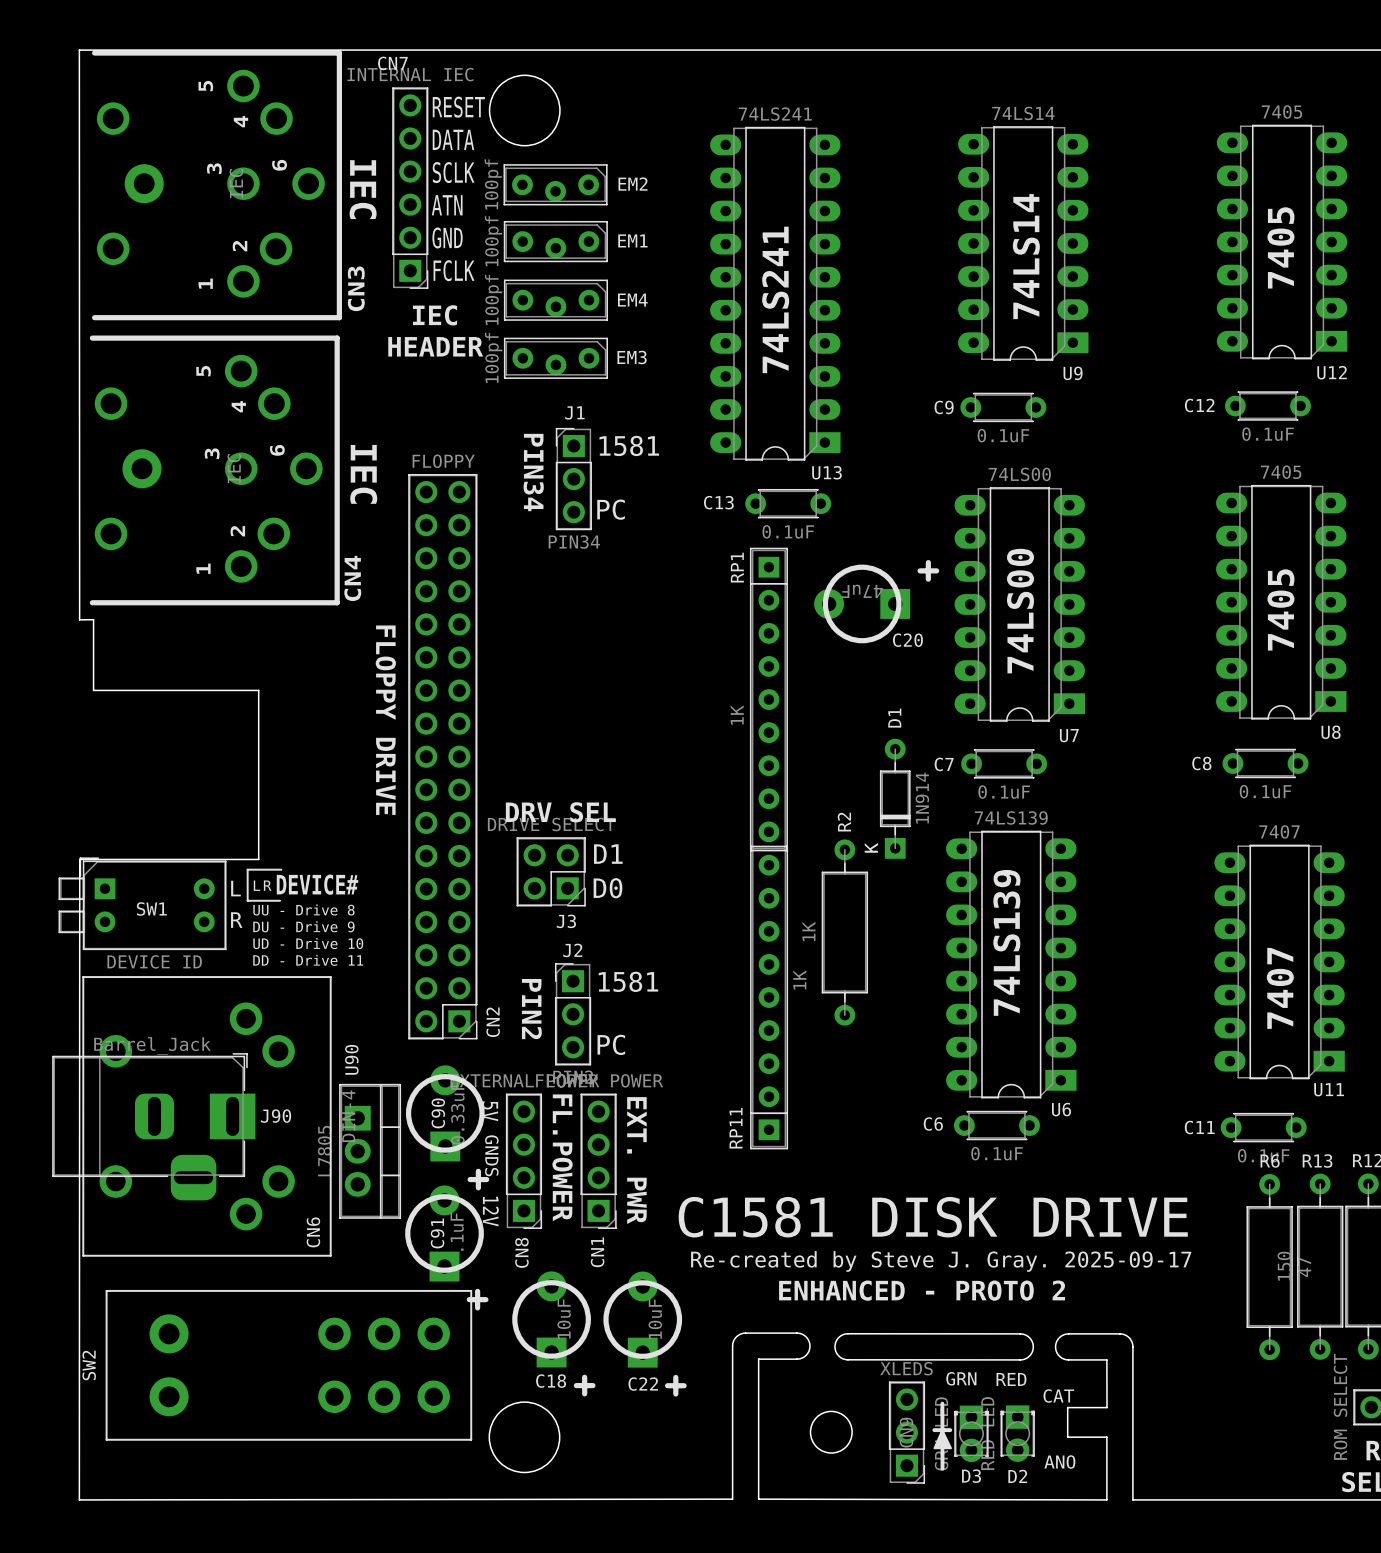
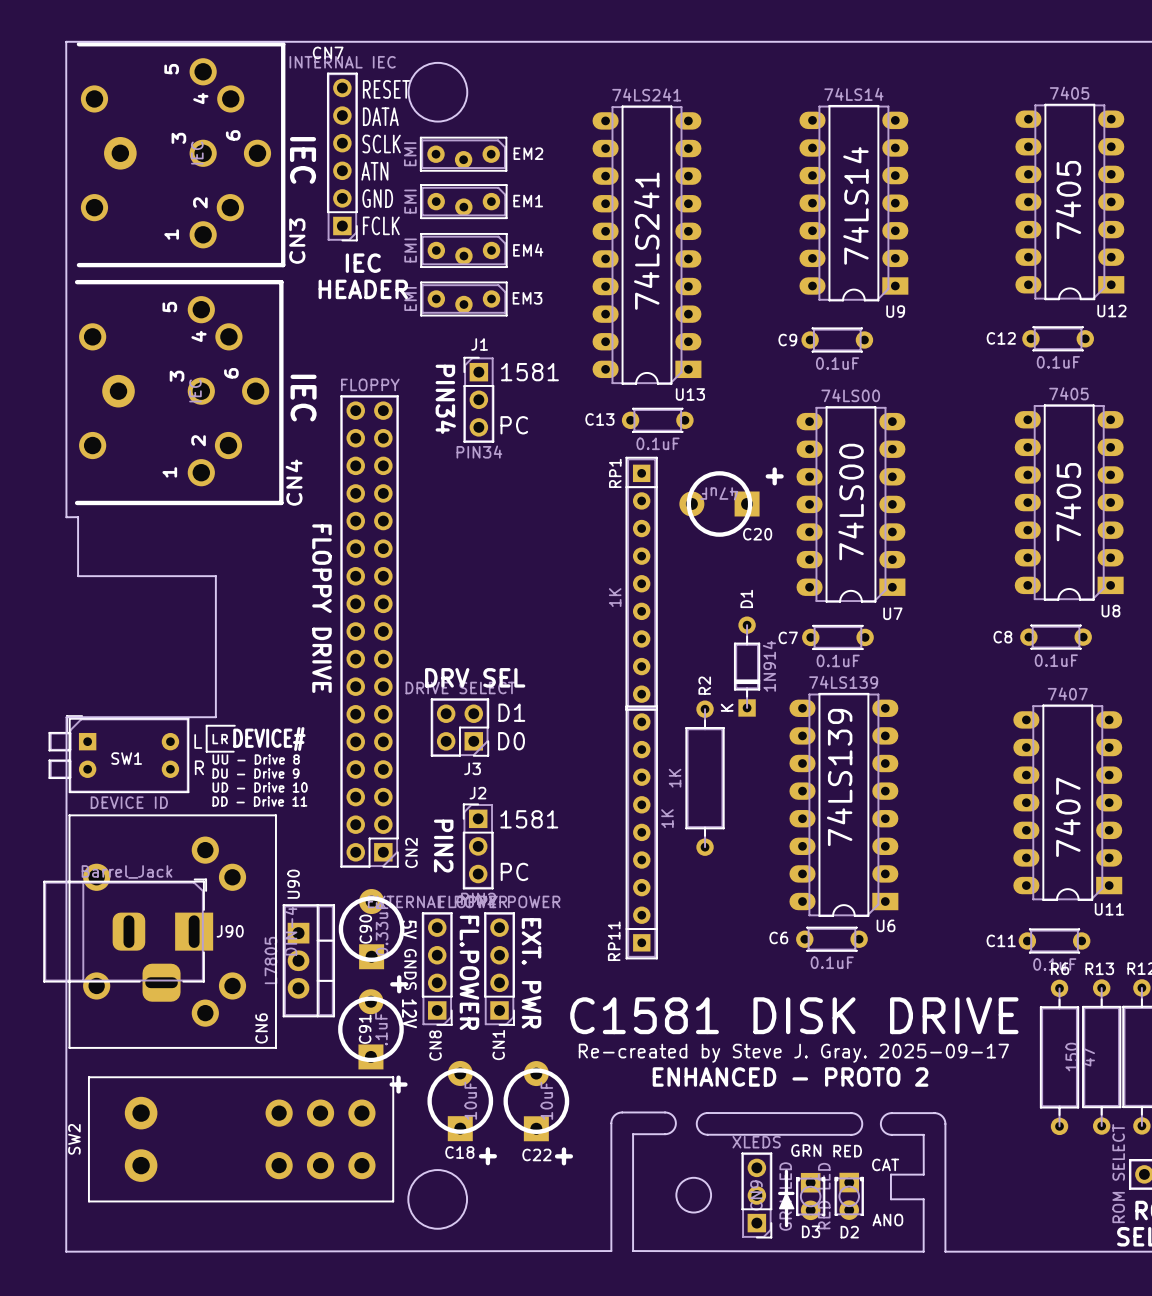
EM2 value: 100pf (493, 184) -> EMI (410, 154)
EM1 value: 100pf (493, 241) -> EMI (410, 201)
EM4 value: 100pf (493, 299) -> EMI (410, 250)
EM3 value: 100pf (493, 357) -> EMI (410, 298)

